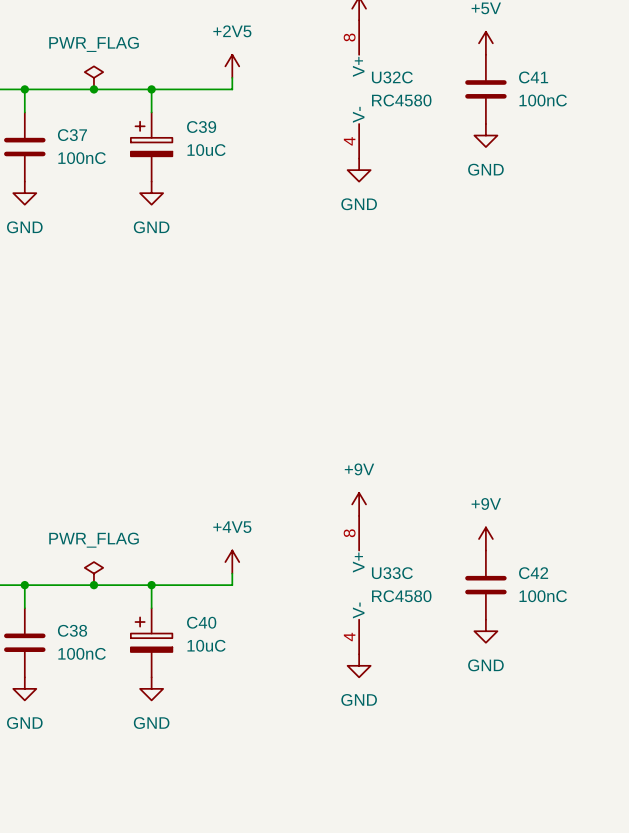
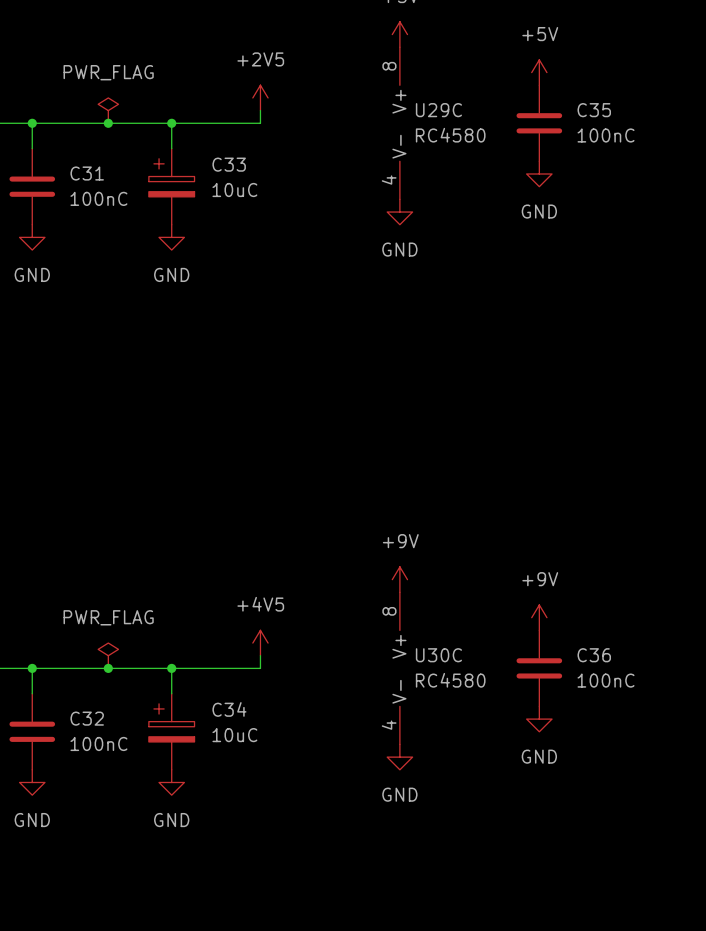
U32C name: U32C (392, 77) -> U29C (438, 110)
C41 name: C41 (533, 77) -> C35 (594, 110)
C39 name: C39 (201, 127) -> C33 (229, 164)
C37 name: C37 (72, 135) -> C31 (87, 173)
U33C name: U33C (392, 573) -> U30C (438, 655)
C42 name: C42 (533, 573) -> C36 (594, 655)
C40 name: C40 (201, 622) -> C34 (229, 709)
C38 name: C38 (72, 630) -> C32 (87, 718)

